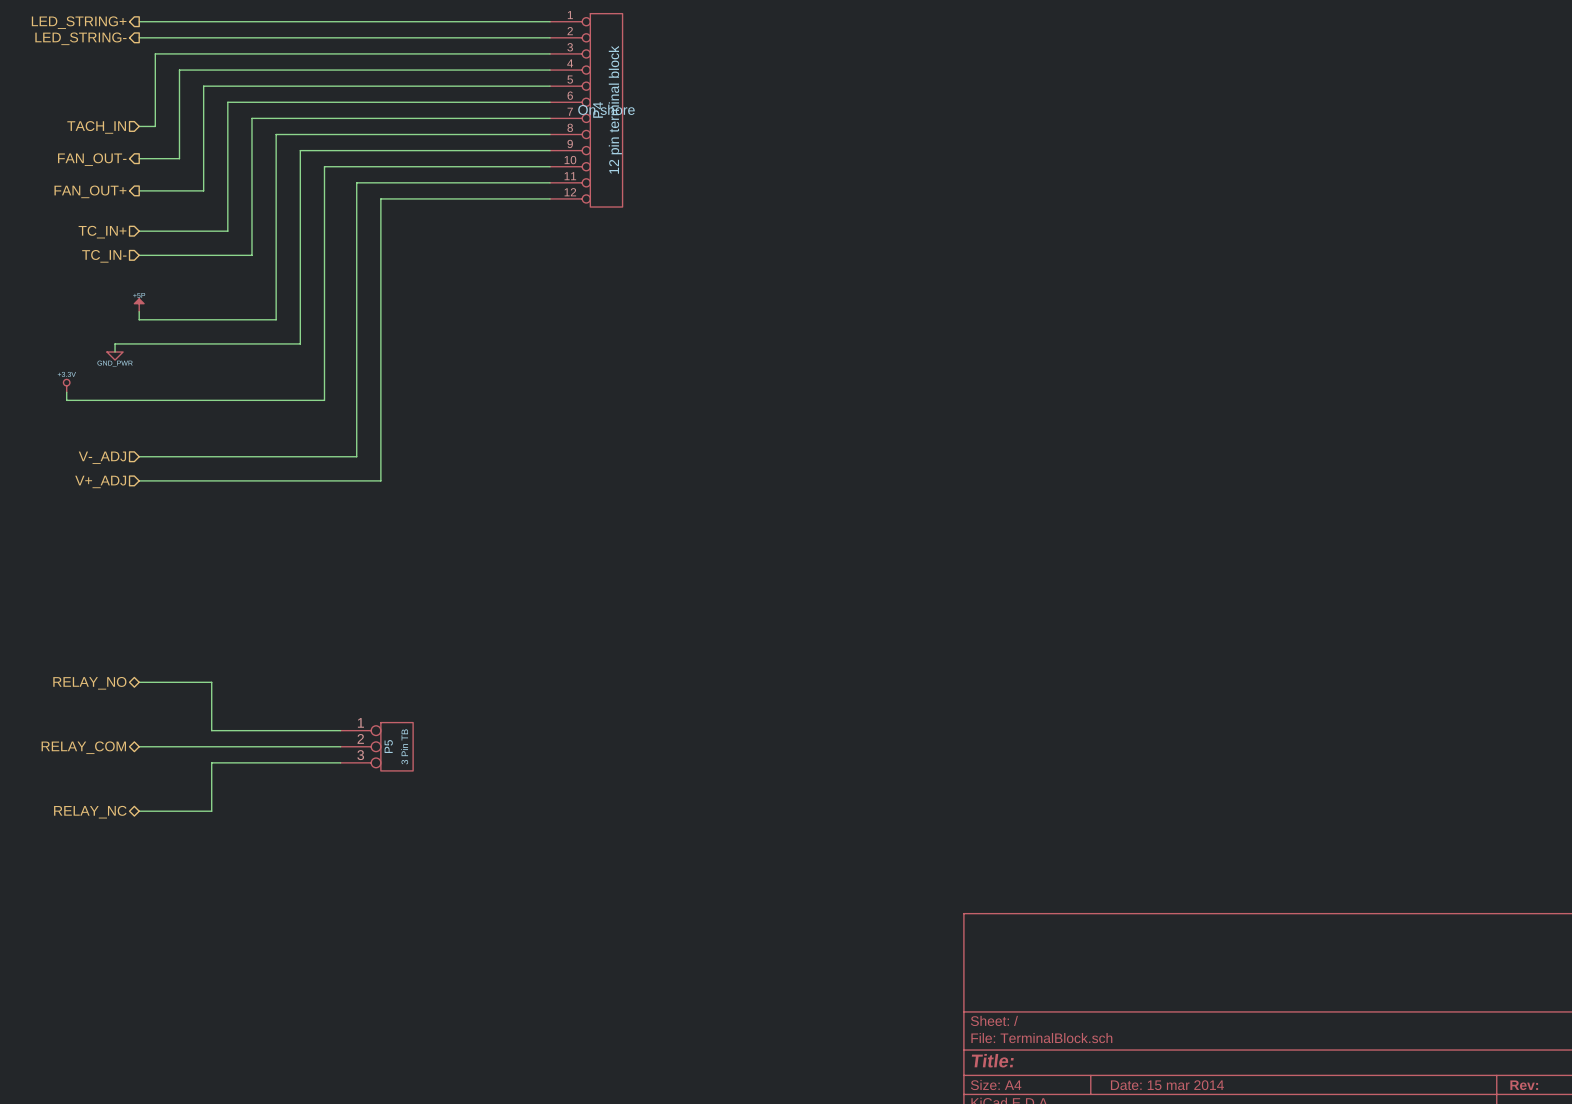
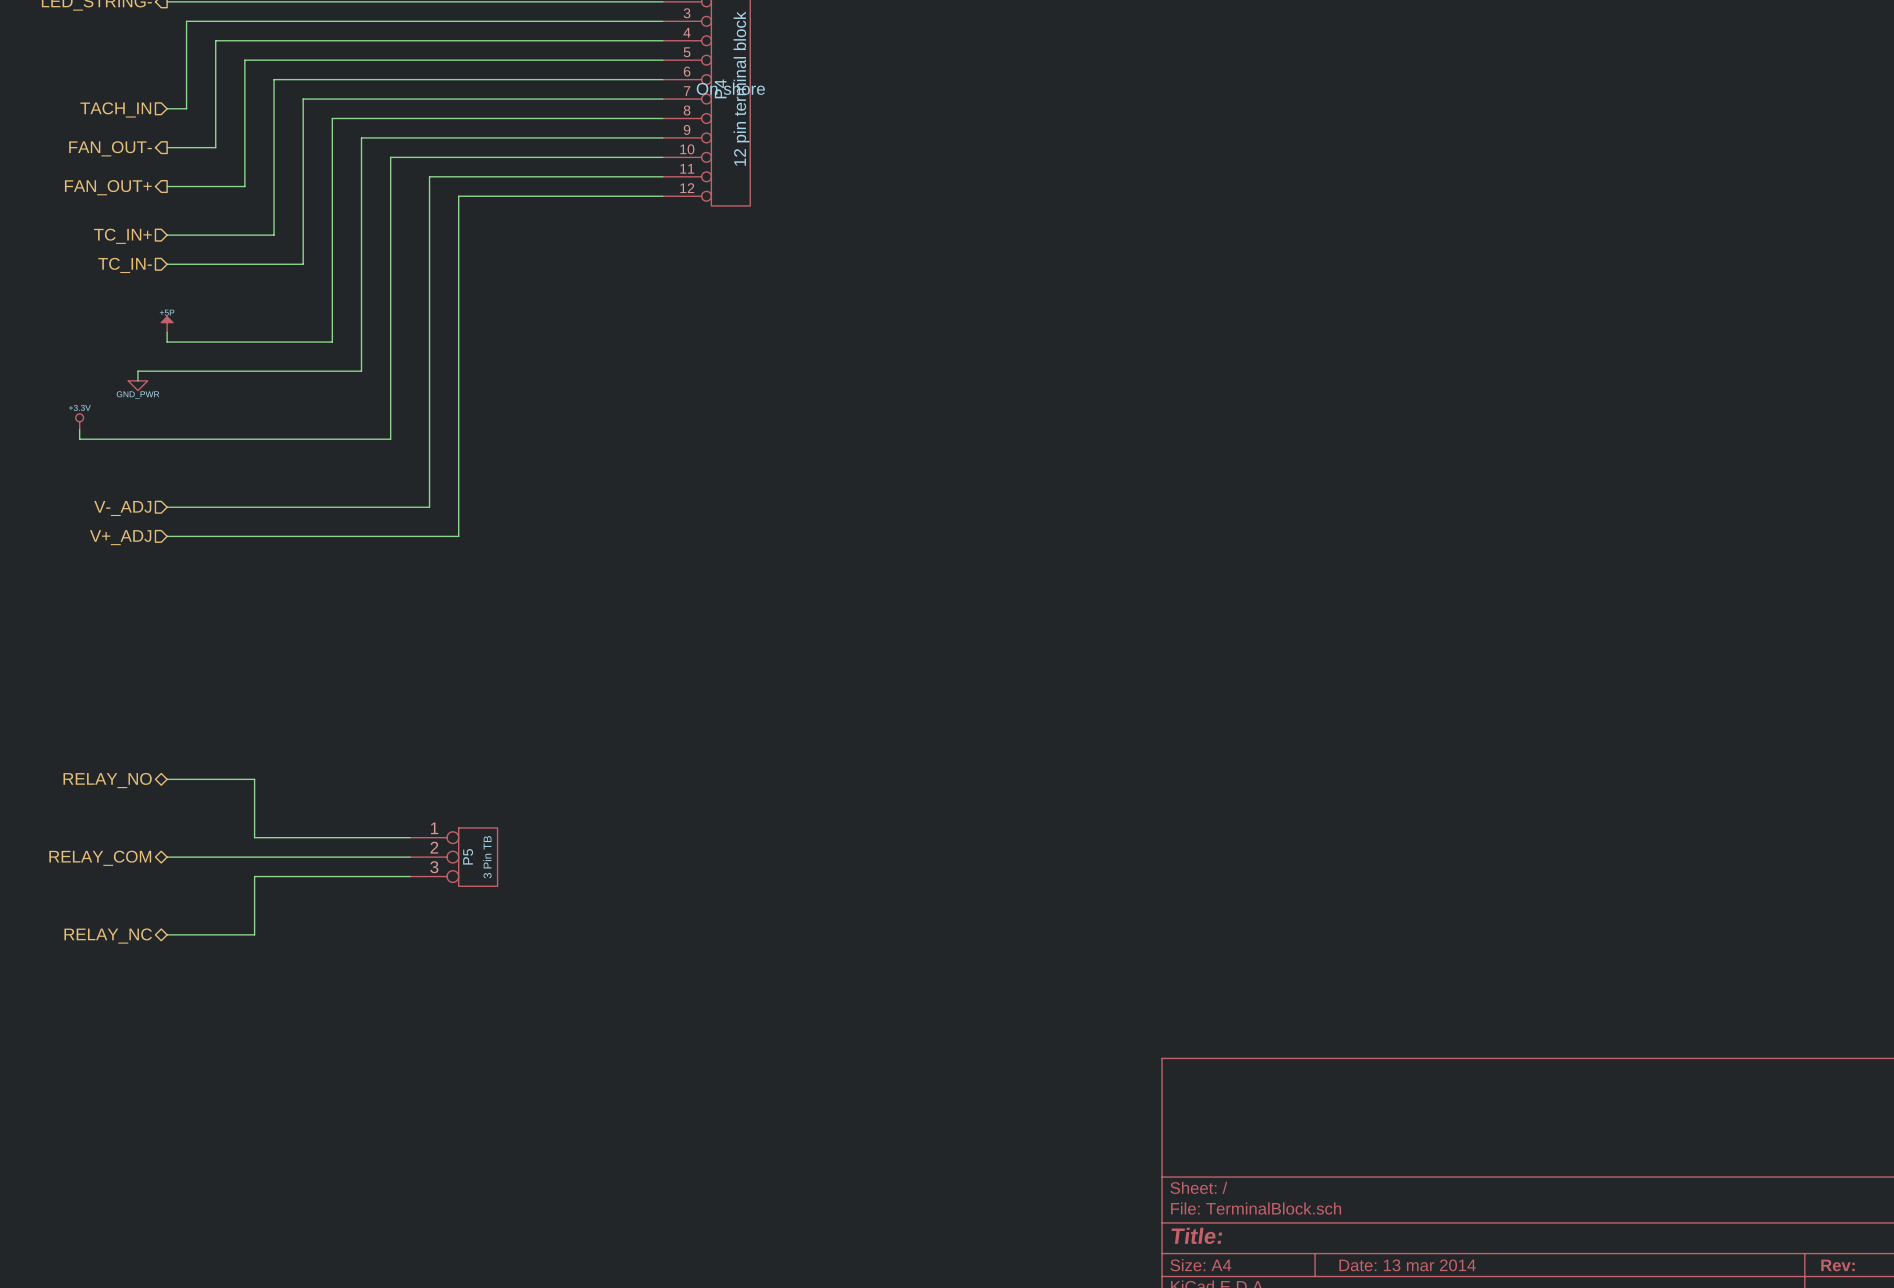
title block: Date: 15 mar 2014 (1167, 1085) -> Date: 13 mar 2014 (1407, 1265)

